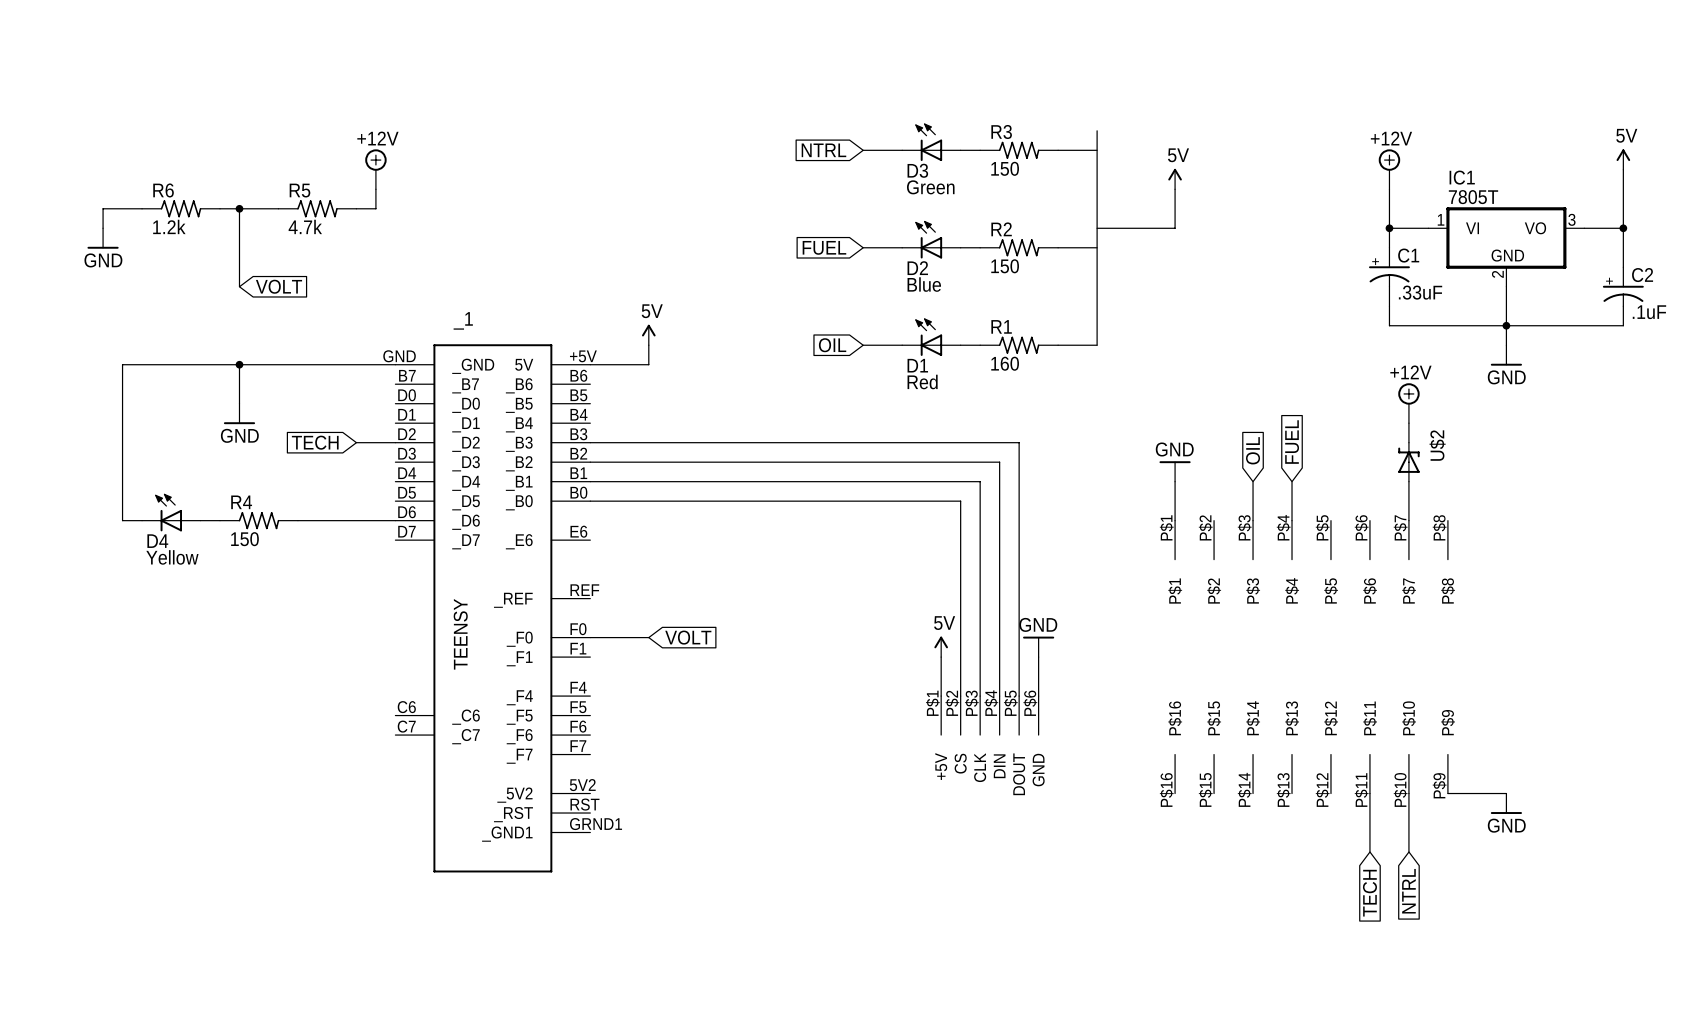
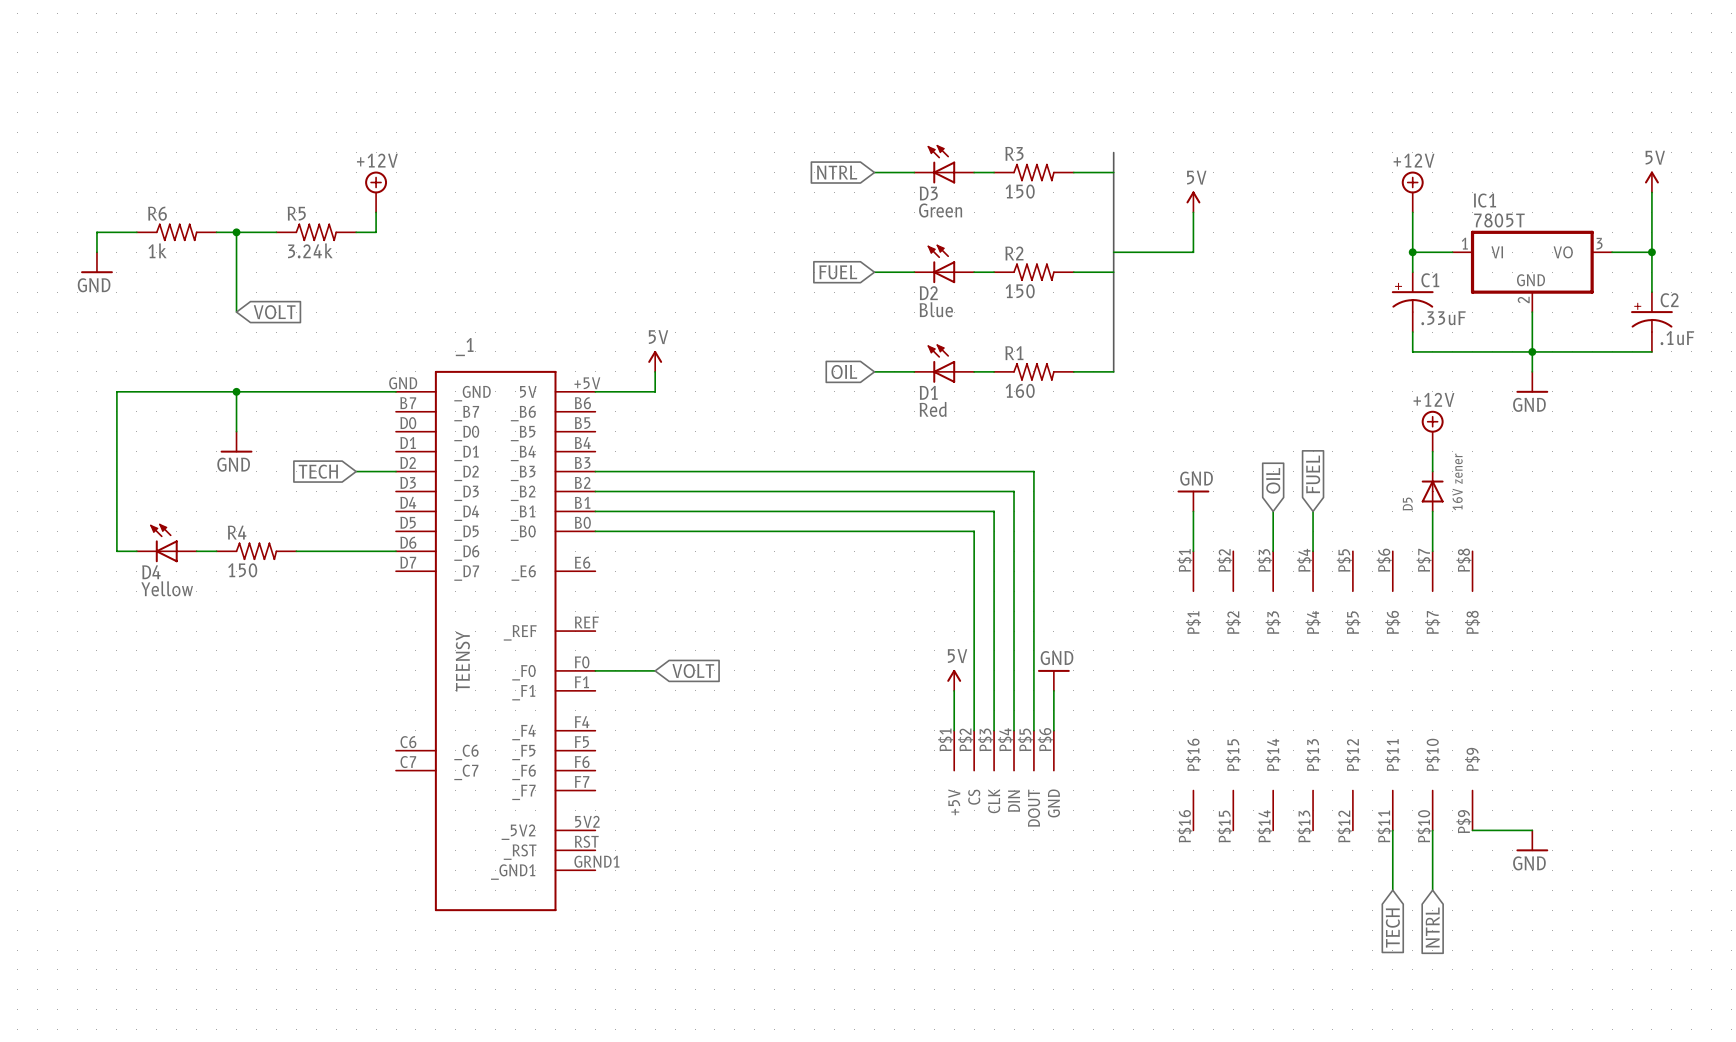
R6 value: 1.2k (169, 226) -> 1k (157, 250)
R5 value: 4.7k (305, 226) -> 3.24k (310, 250)
U$2: (1408, 462) -> none
D5: none -> 16V zener (1432, 491)

